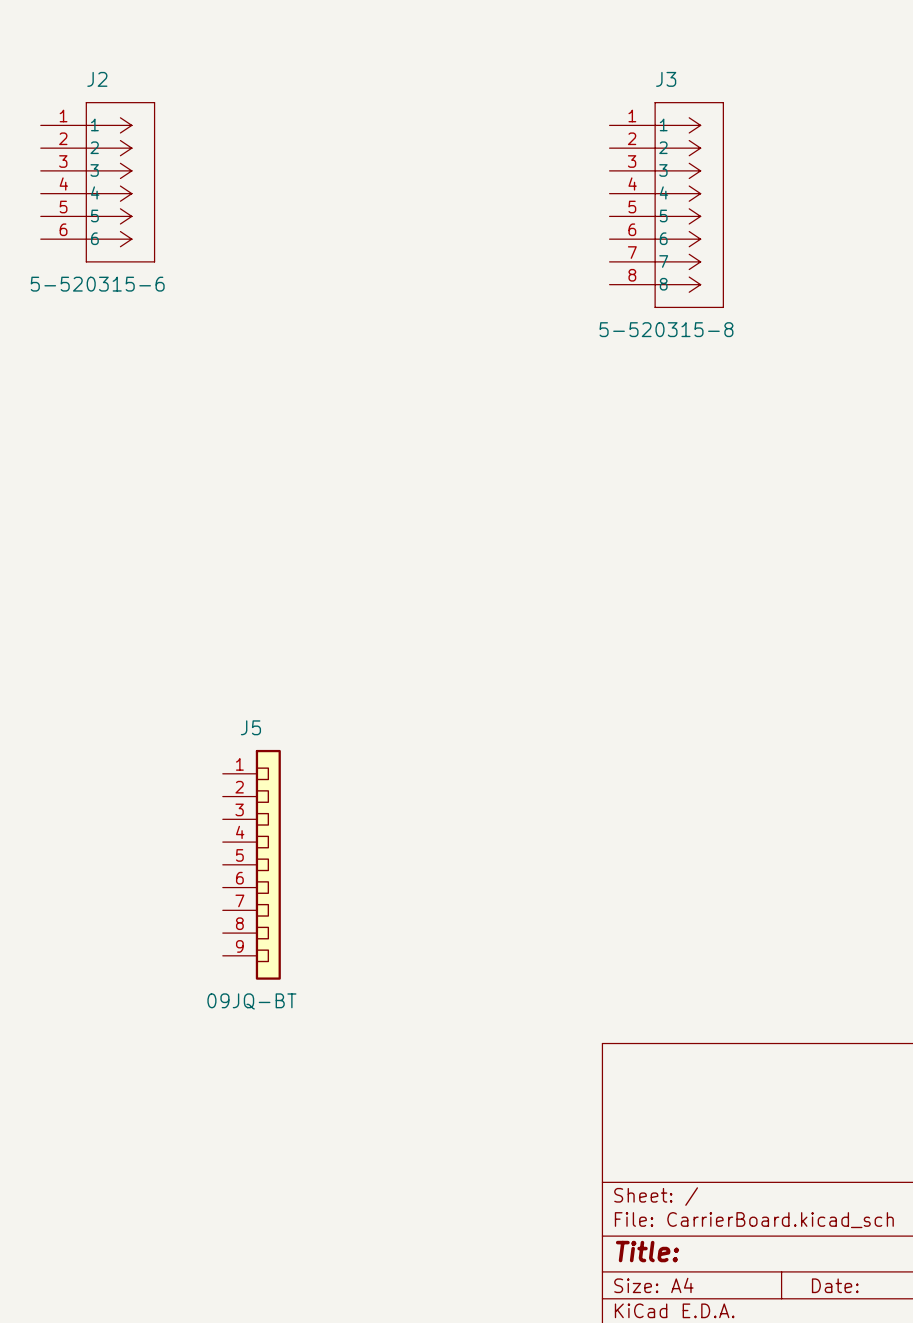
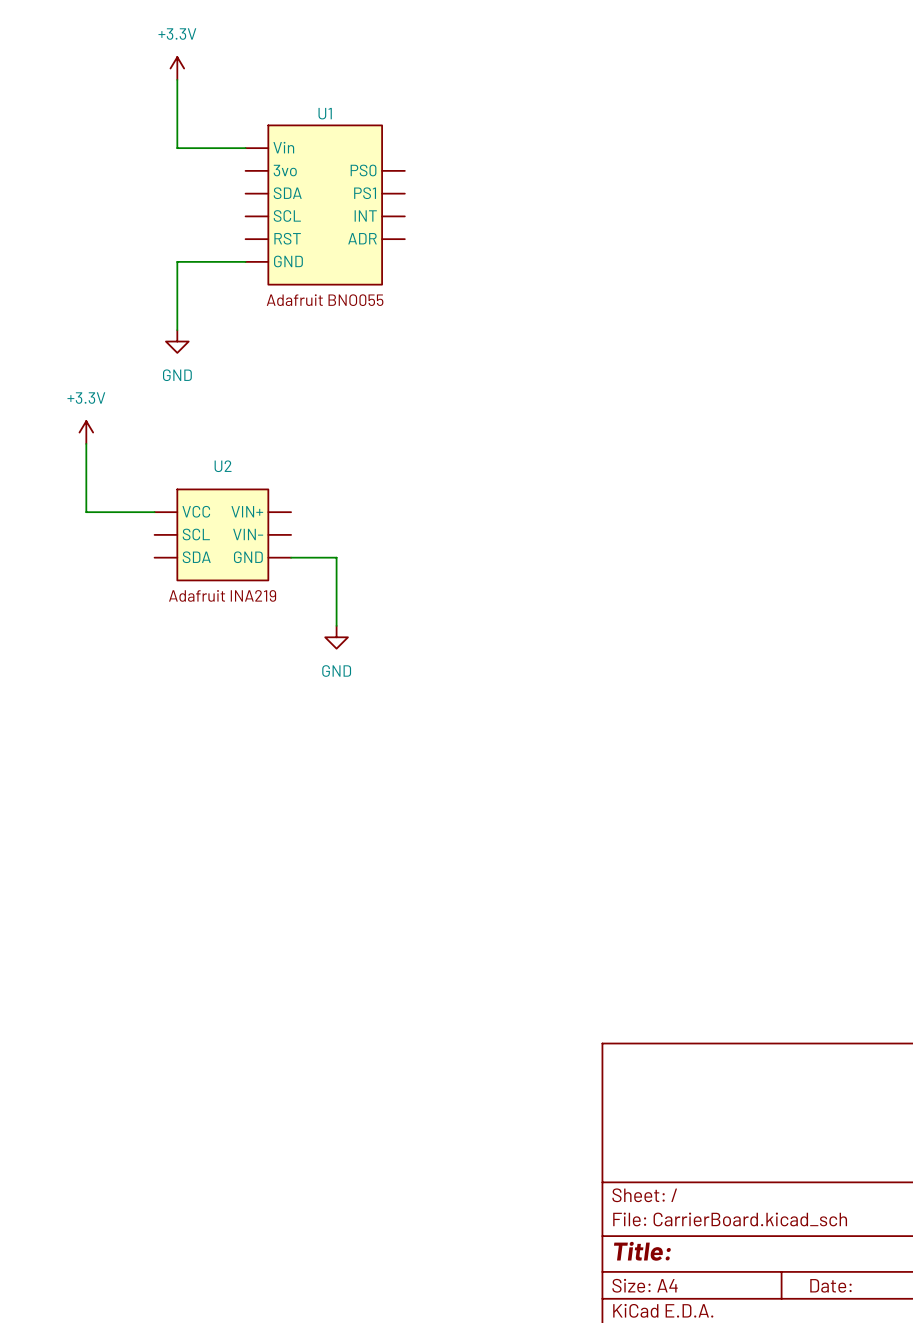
power symbol: none -> +3.3V (177, 68)
wire: none -> (177, 79) (177, 148) (245, 148)
J2: 5-520315-6 (97, 182) -> none
U1: none -> (325, 205)
J3: 5-520315-8 (666, 205) -> none
wire: none -> (245, 261) (177, 261) (177, 330)
power symbol: none -> GND (177, 341)
power symbol: none -> +3.3V (86, 432)
wire: none -> (86, 443) (86, 512) (154, 512)
U2: none -> (222, 534)
wire: none -> (291, 557) (336, 557) (336, 625)
power symbol: none -> GND (336, 637)
J5: 09JQ-BT (251, 864) -> none

